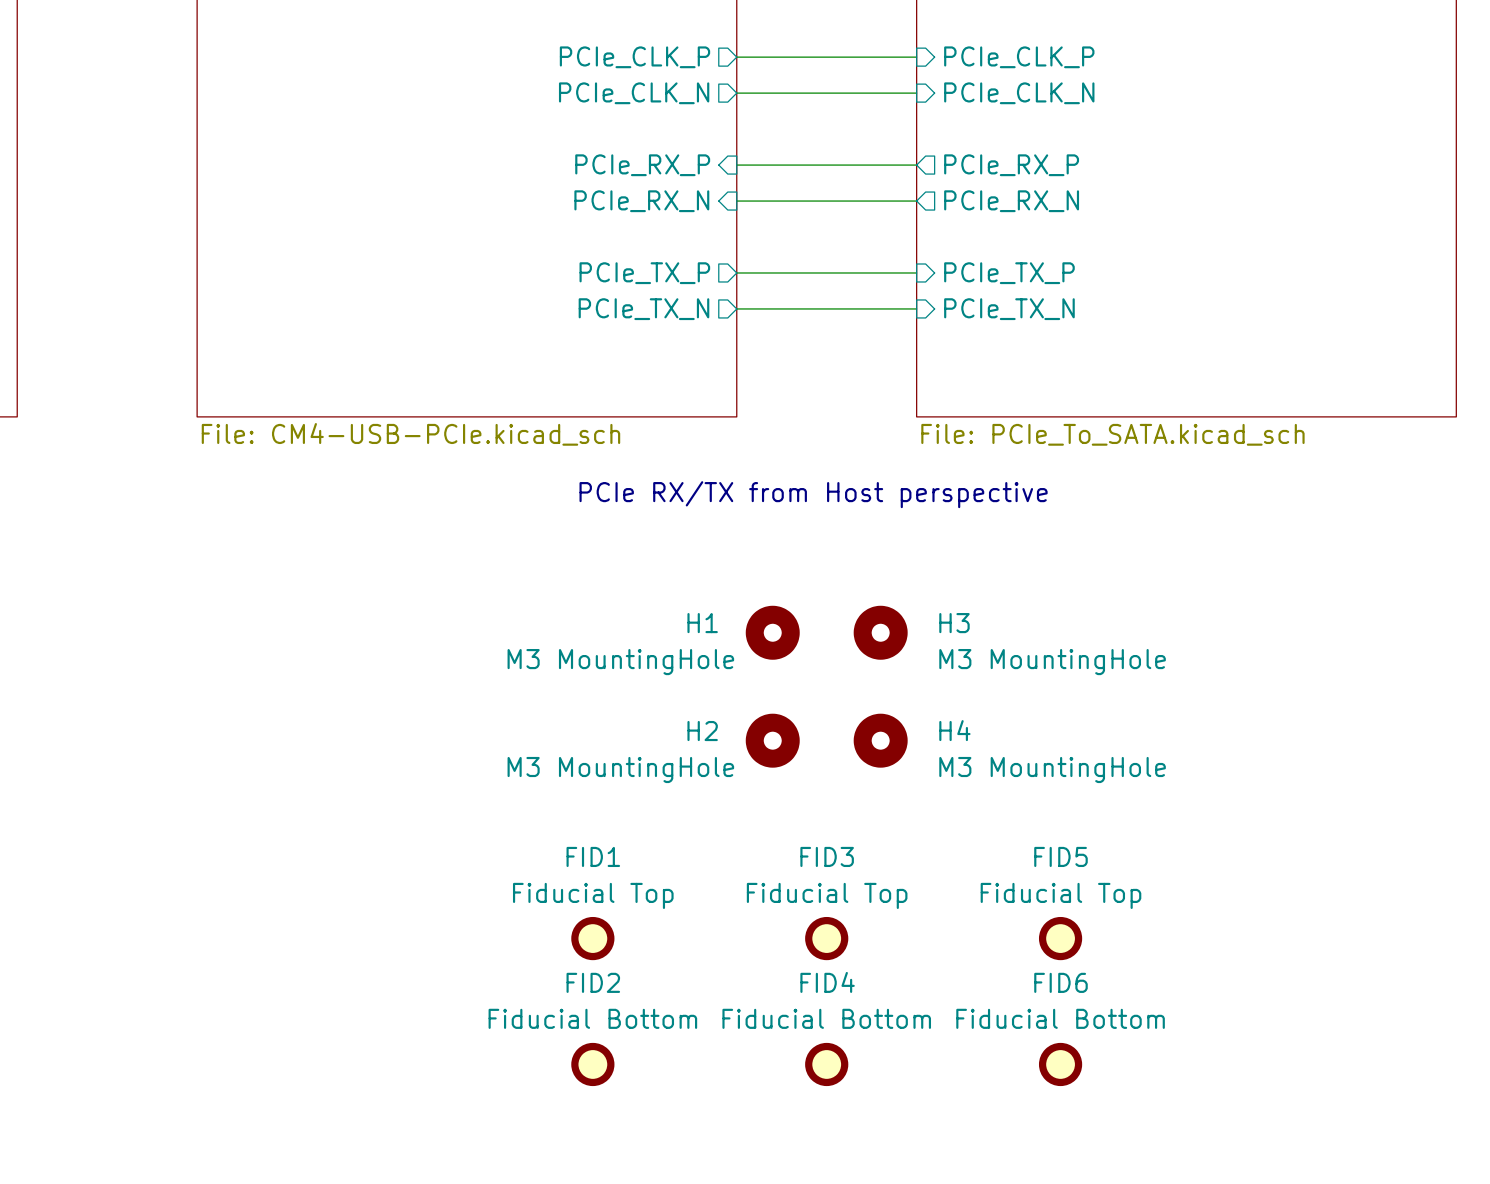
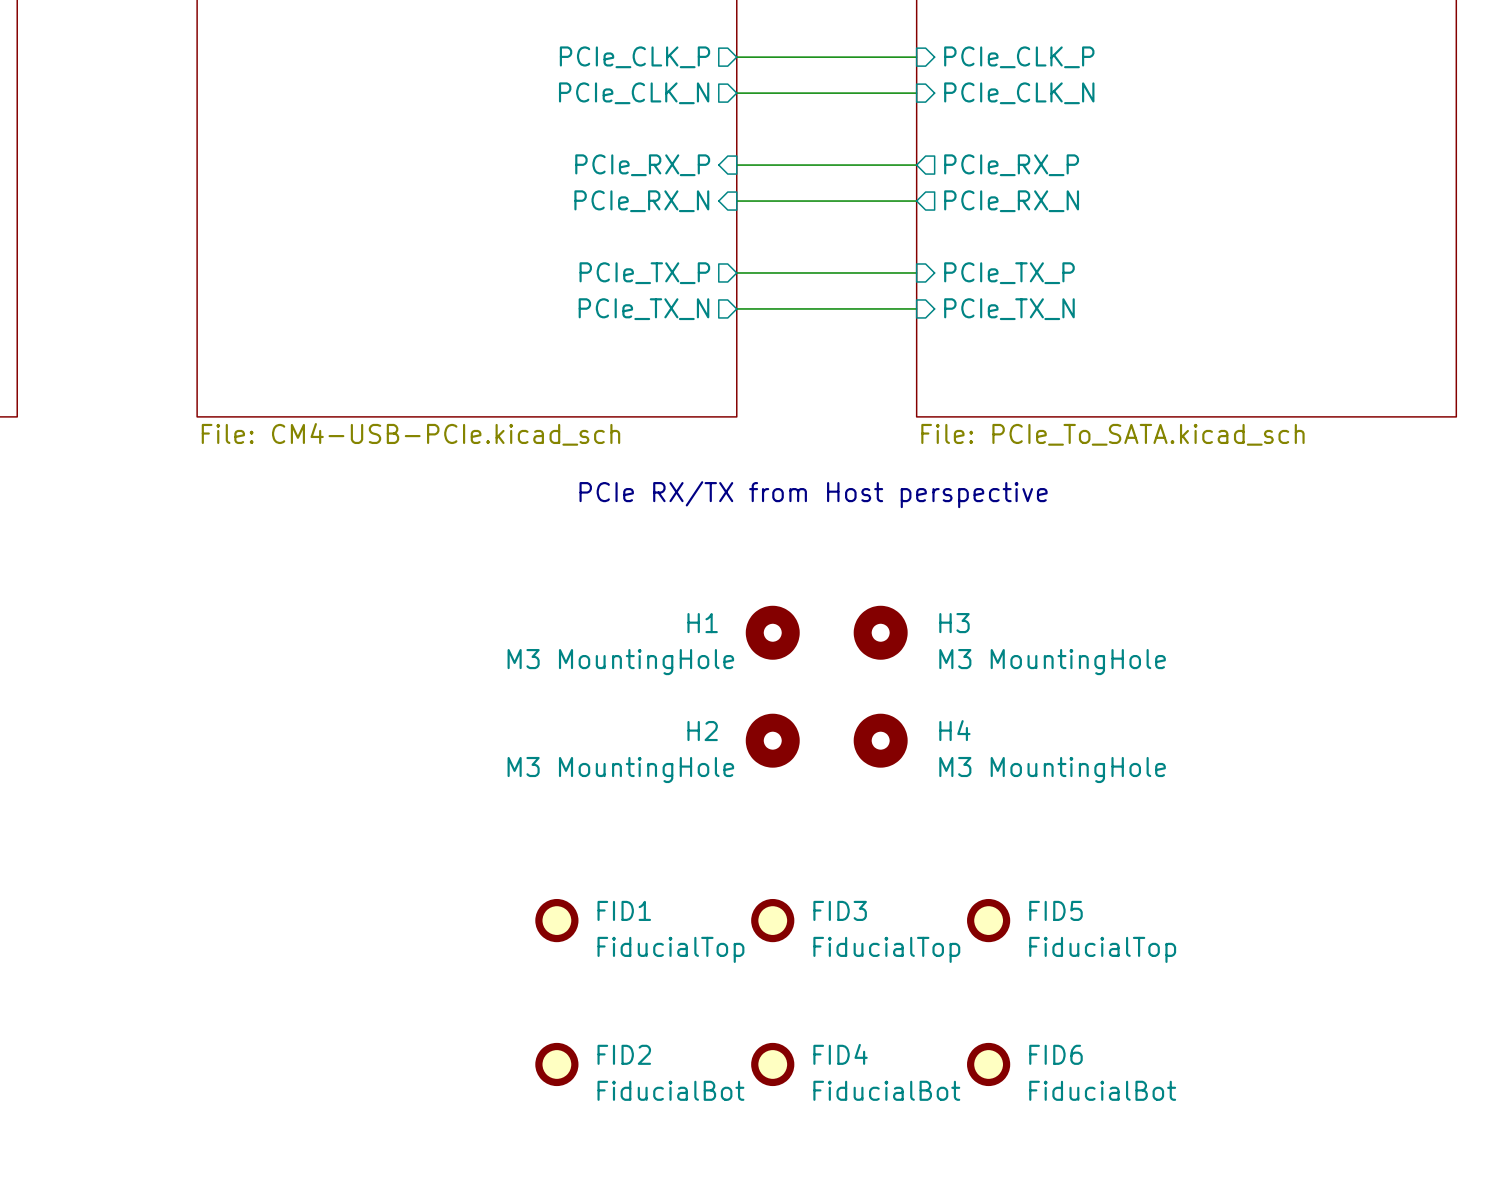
FID1 name position: FID1 (593, 856) -> FID1 (624, 910)
FID3 name position: FID3 (827, 856) -> FID3 (840, 910)
FID5 name position: FID5 (1060, 856) -> FID5 (1055, 910)
FID1 value: Fiducial Top (593, 895) -> FiducialTop (670, 949)
FID3 value: Fiducial Top (827, 895) -> FiducialTop (886, 949)
FID5 value: Fiducial Top (1060, 895) -> FiducialTop (1102, 949)
FID1 position: (592, 938) -> (556, 920)
FID3 position: (826, 938) -> (772, 920)
FID5 position: (1060, 938) -> (988, 920)
FID2 name position: FID2 (593, 982) -> FID2 (624, 1054)
FID4 name position: FID4 (827, 982) -> FID4 (840, 1054)
FID6 name position: FID6 (1060, 982) -> FID6 (1055, 1054)
FID2 value: Fiducial Bottom (592, 1018) -> FiducialBot (670, 1090)
FID4 value: Fiducial Bottom (826, 1018) -> FiducialBot (886, 1090)
FID6 value: Fiducial Bottom (1060, 1018) -> FiducialBot (1102, 1090)
FID2 position: (592, 1064) -> (556, 1064)
FID4 position: (826, 1064) -> (772, 1064)
FID6 position: (1060, 1064) -> (988, 1064)

